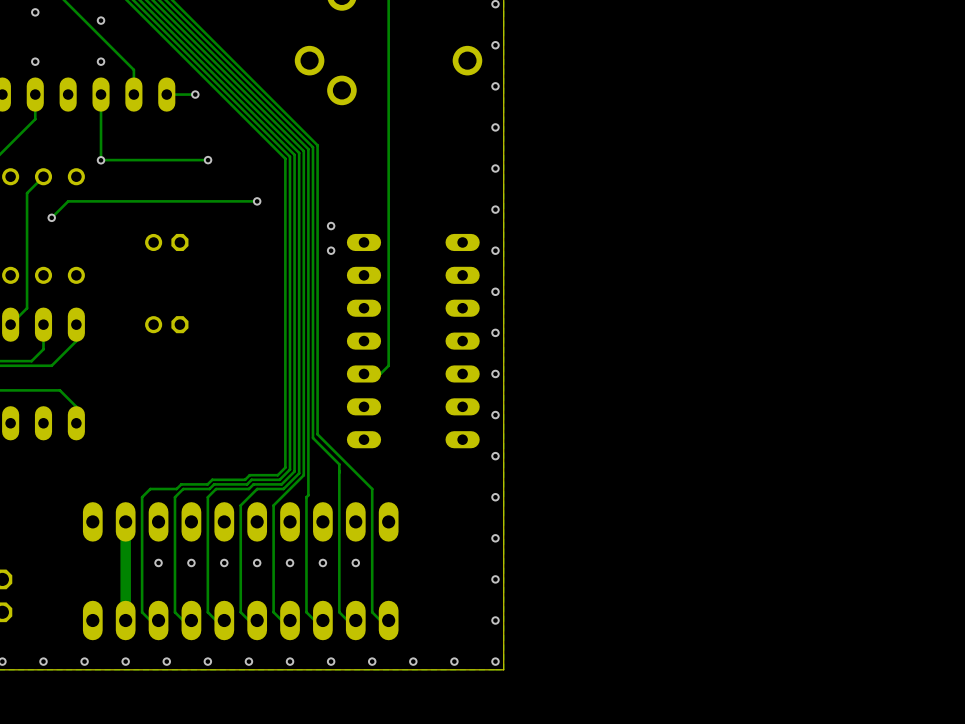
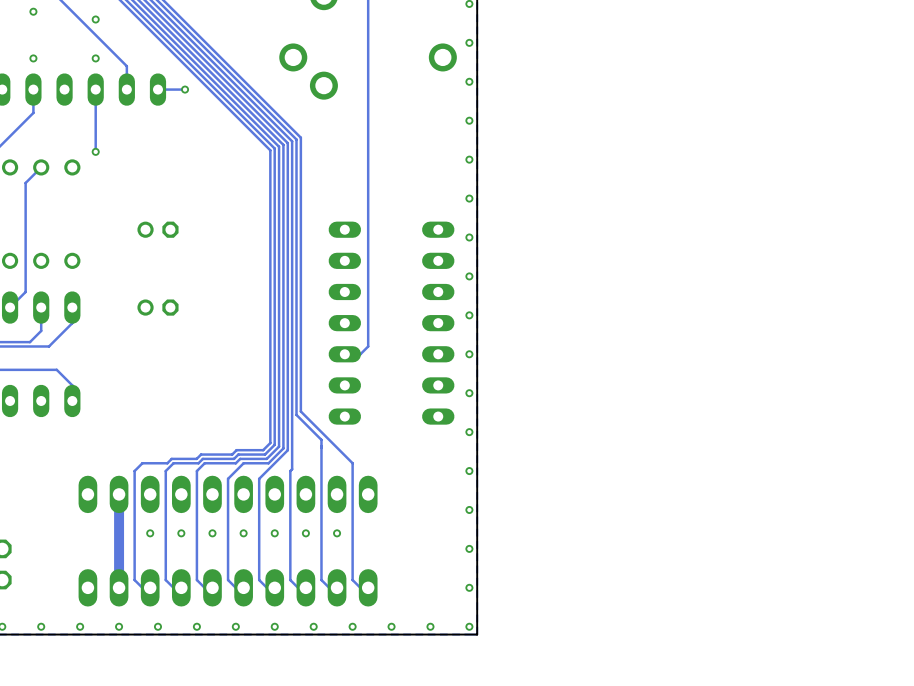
track: (208, 160) (101, 160) -> none
via: (208, 160) -> none
track: (257, 201) (68, 201) (51, 217) -> none
via: (257, 201) -> none
via: (51, 217) -> none
via: (331, 226) -> none
via: (331, 250) -> none

